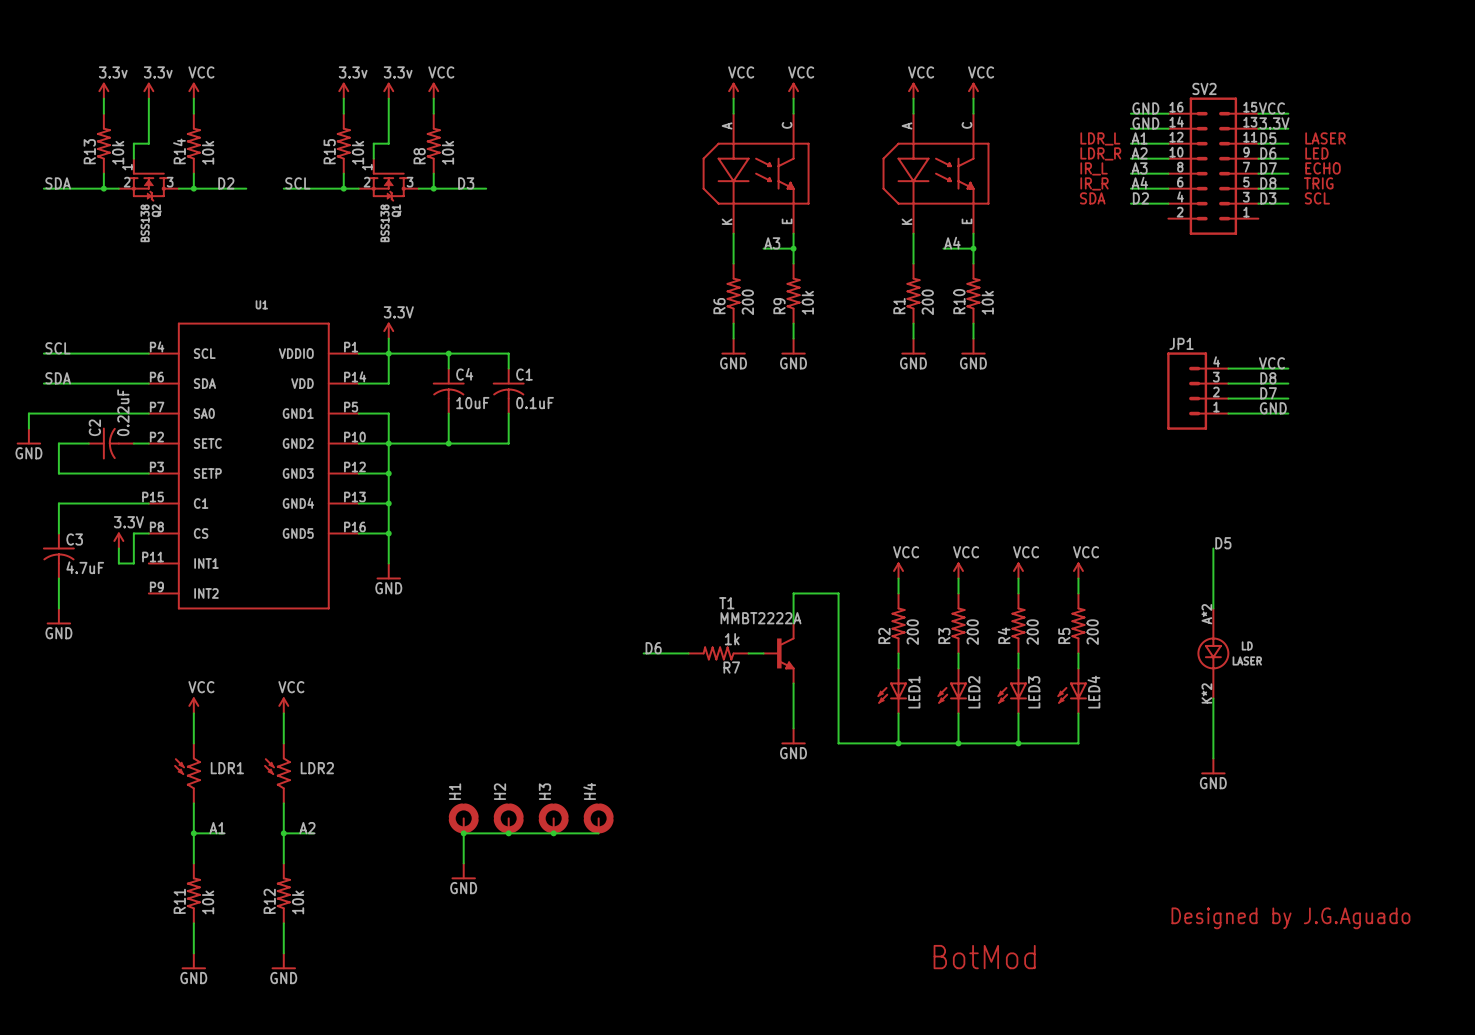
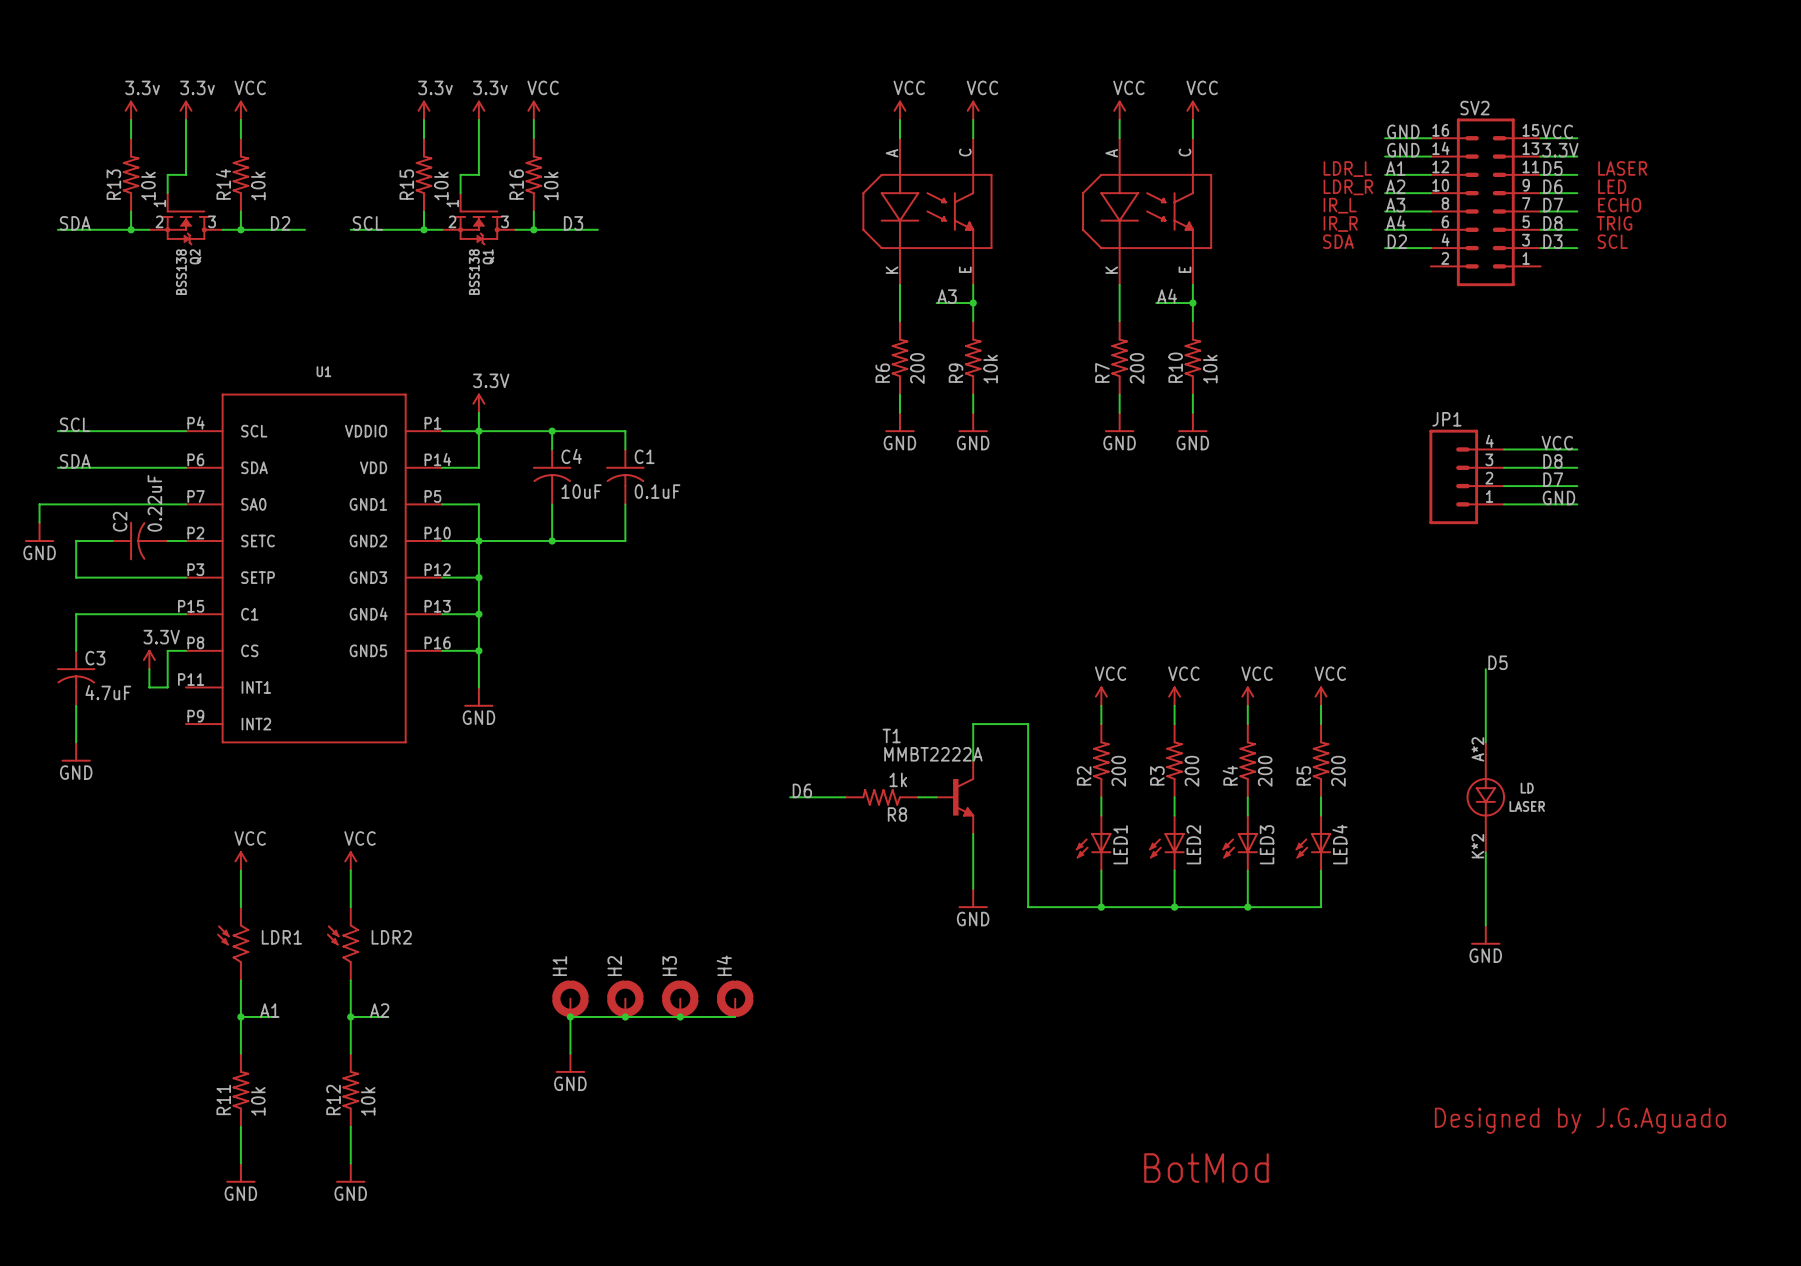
R8 name: R8 (419, 156) -> R16 (516, 184)
R1 name: R1 (899, 306) -> R7 (1102, 372)
R7 name: R7 (731, 667) -> R8 (897, 814)

